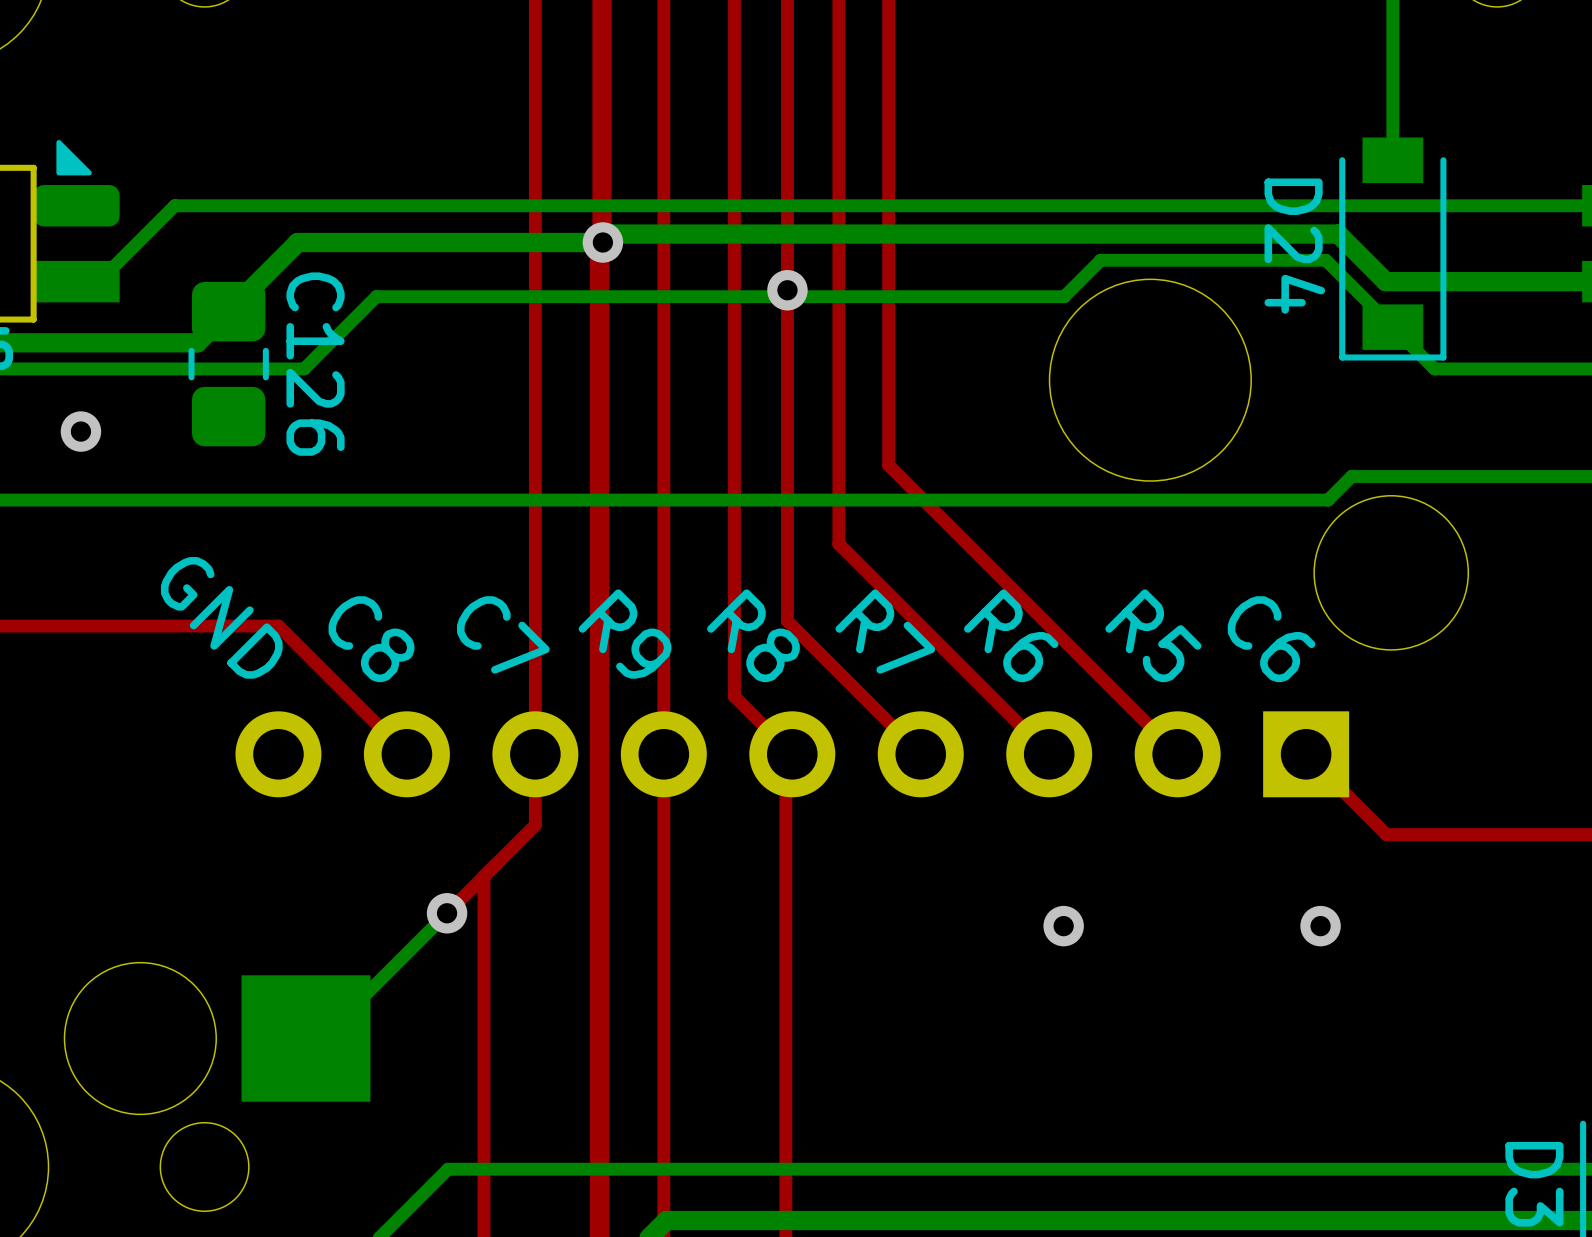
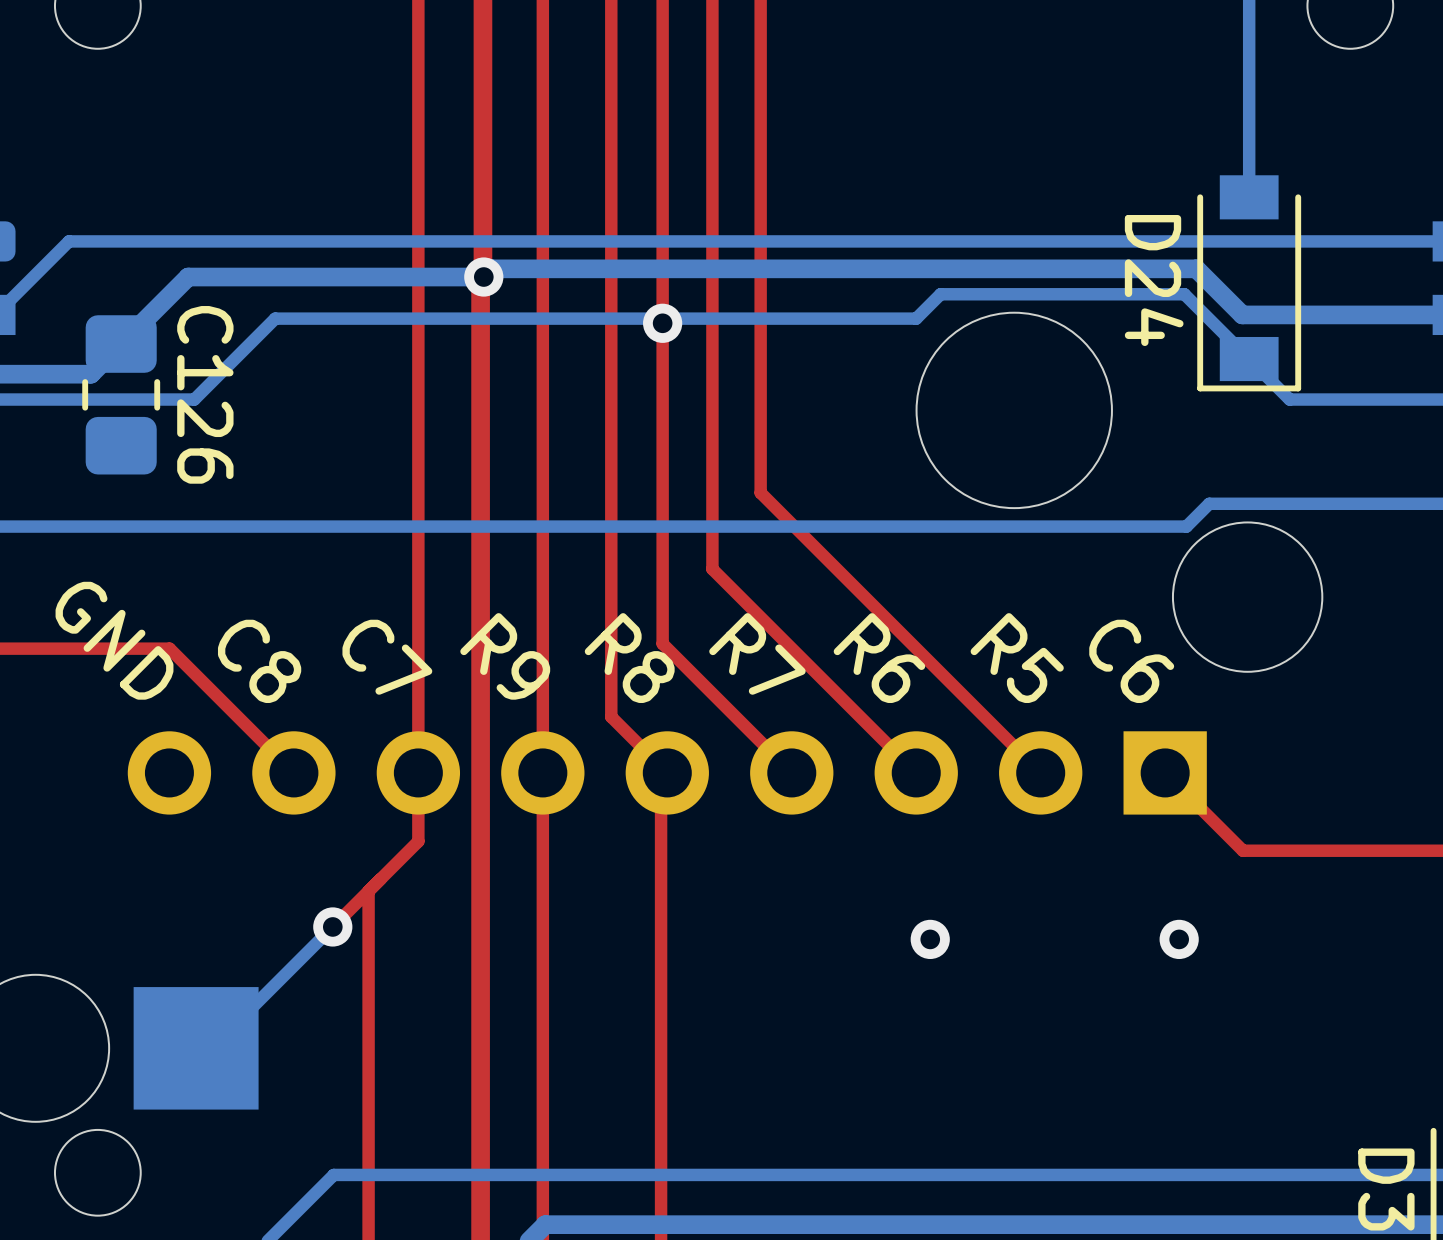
bottom track: (1100, 260) (1064, 296) (376, 296) -> (966, 294) (940, 294) (916, 318) (275, 318) (264, 329)

